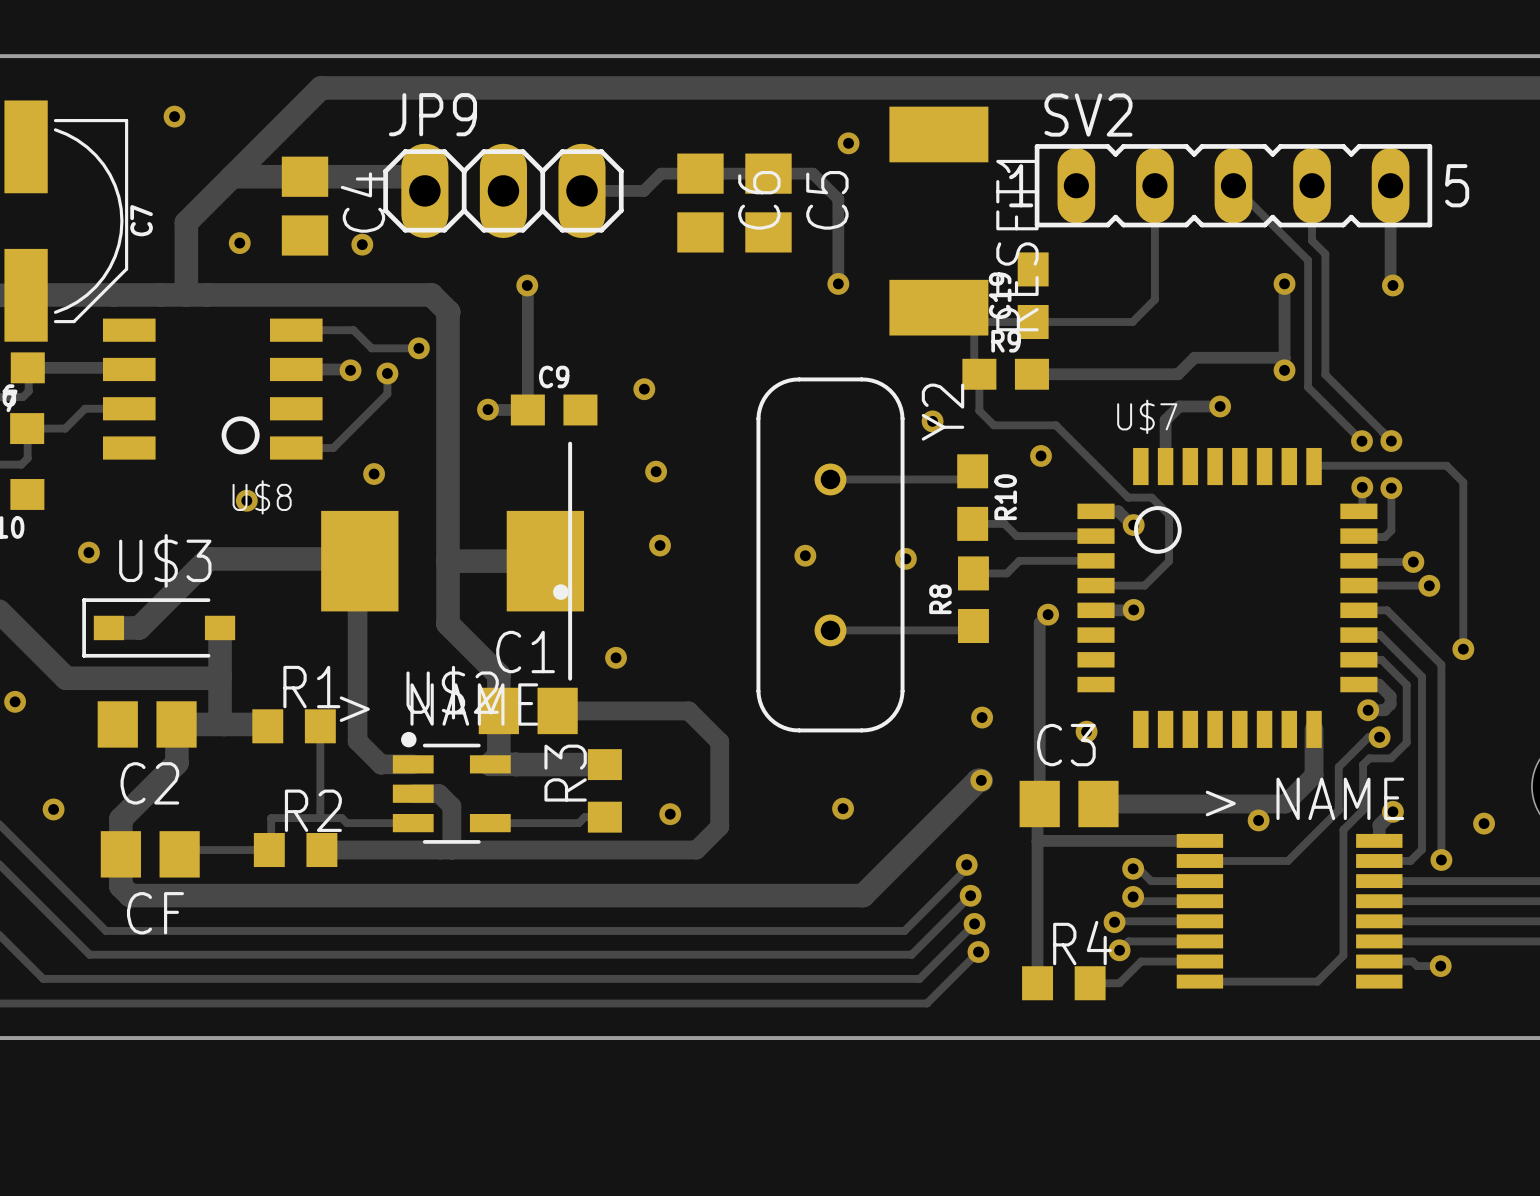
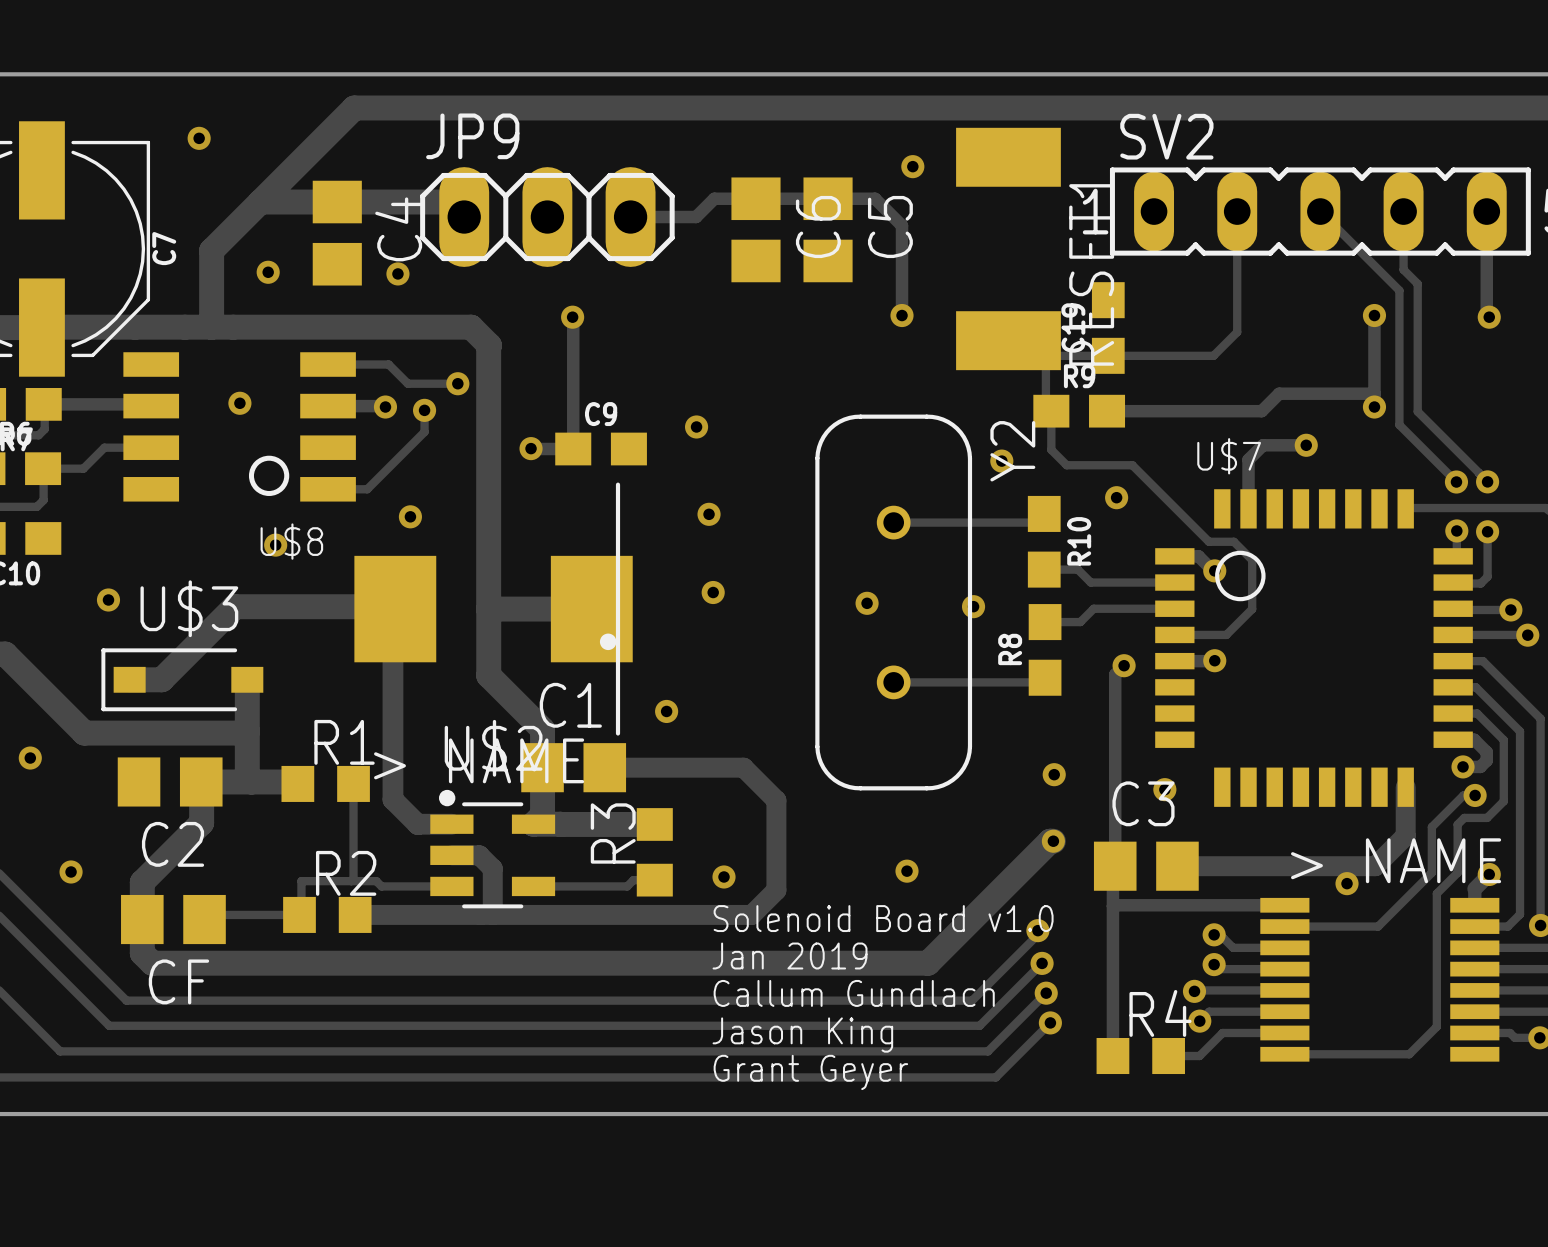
via: none -> (239, 403)
text: none -> Solenoid Board v1.0 (883, 918)
text: none -> Jan 2019 (790, 956)
text: none -> Callum Gundlach (854, 993)
text: none -> Jason King (802, 1035)
text: none -> Grant Geyer (810, 1072)

